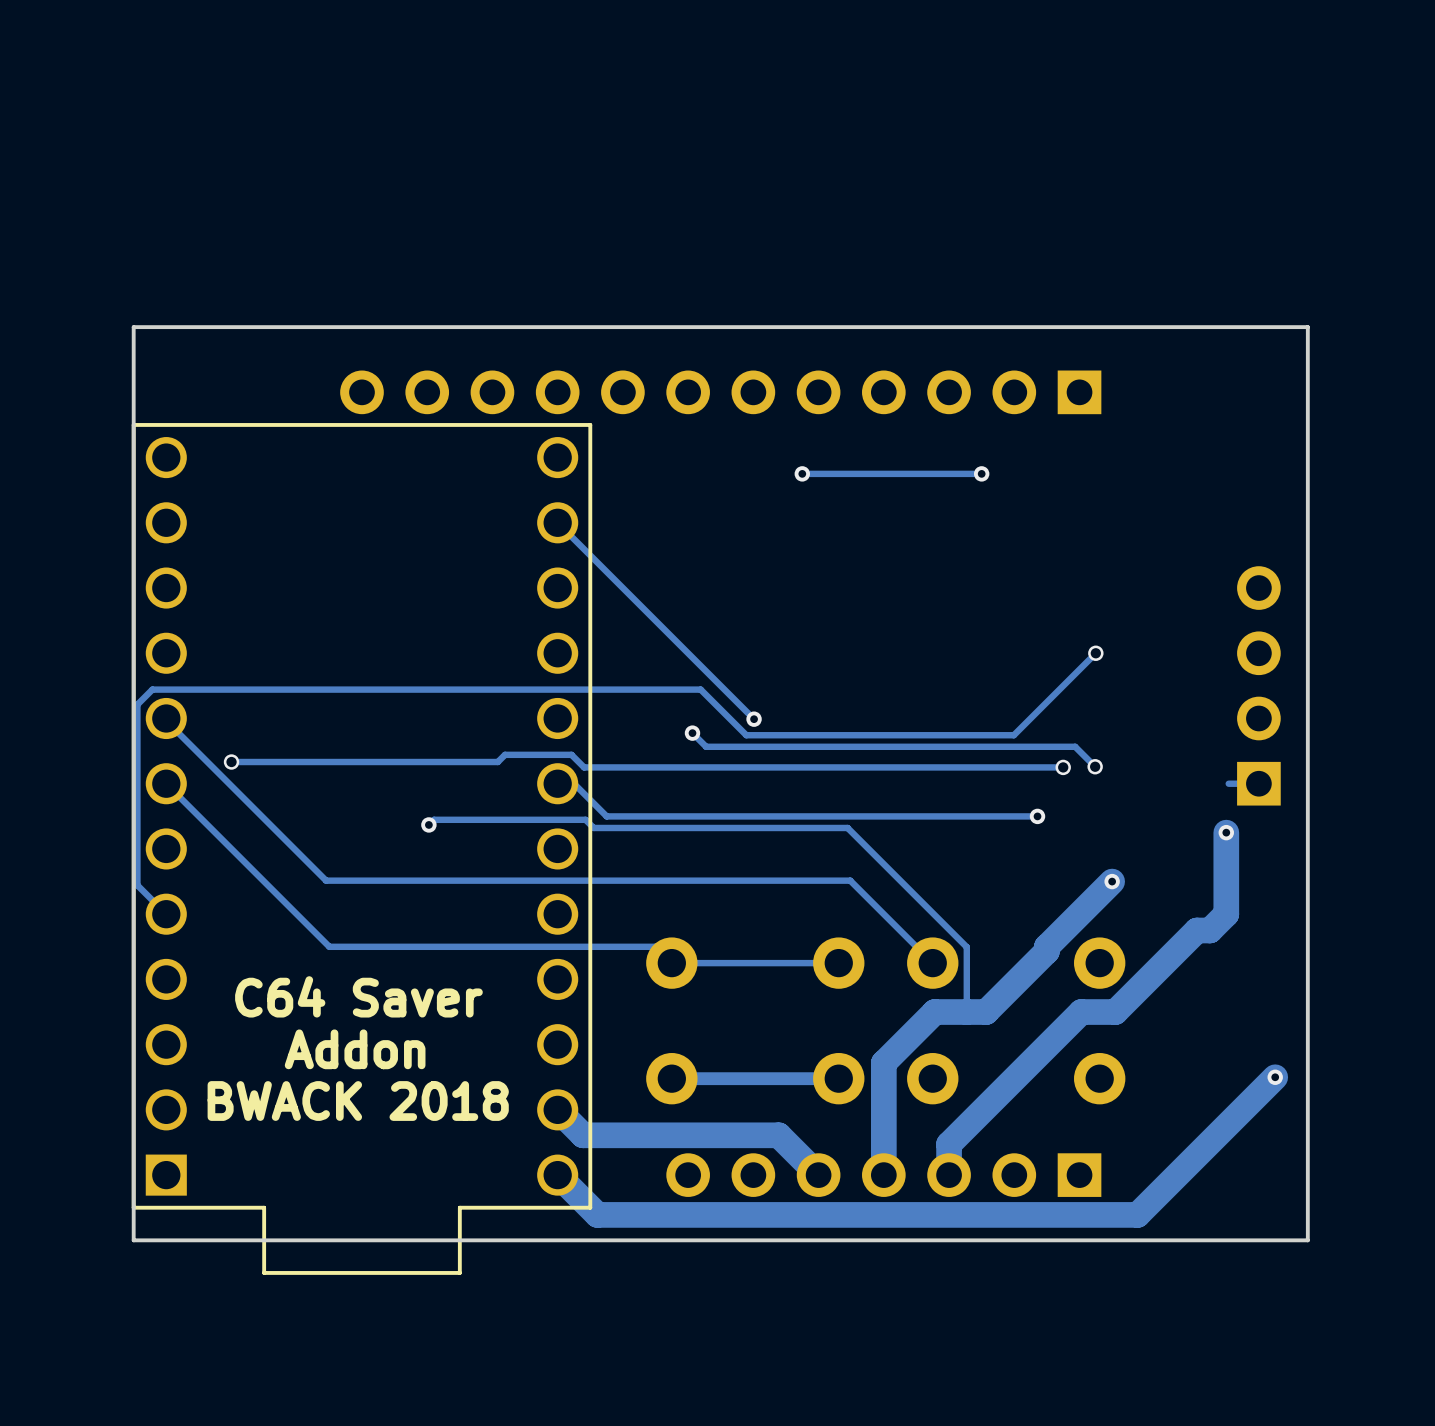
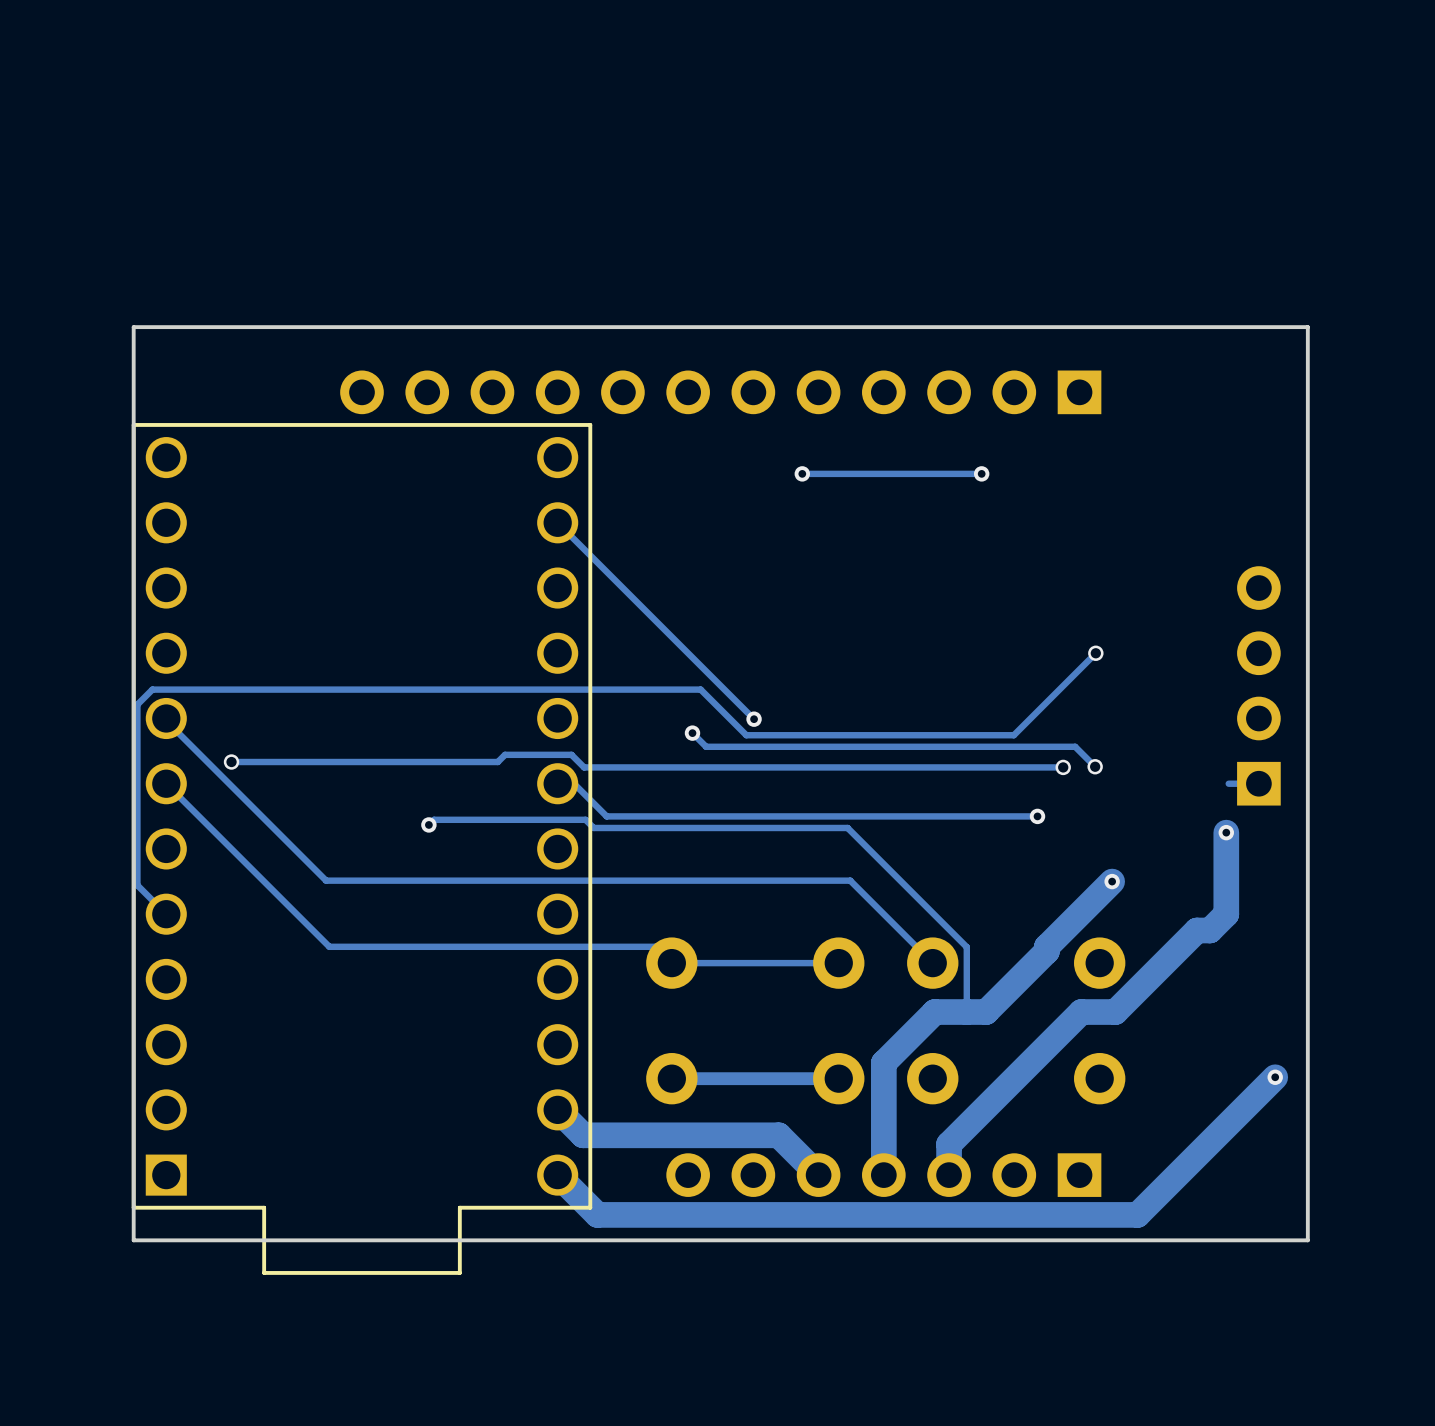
text: C64 Saver (358, 996) -> none
text: Addon (355, 1049) -> none
text: BWACK 2018 (358, 1101) -> none

